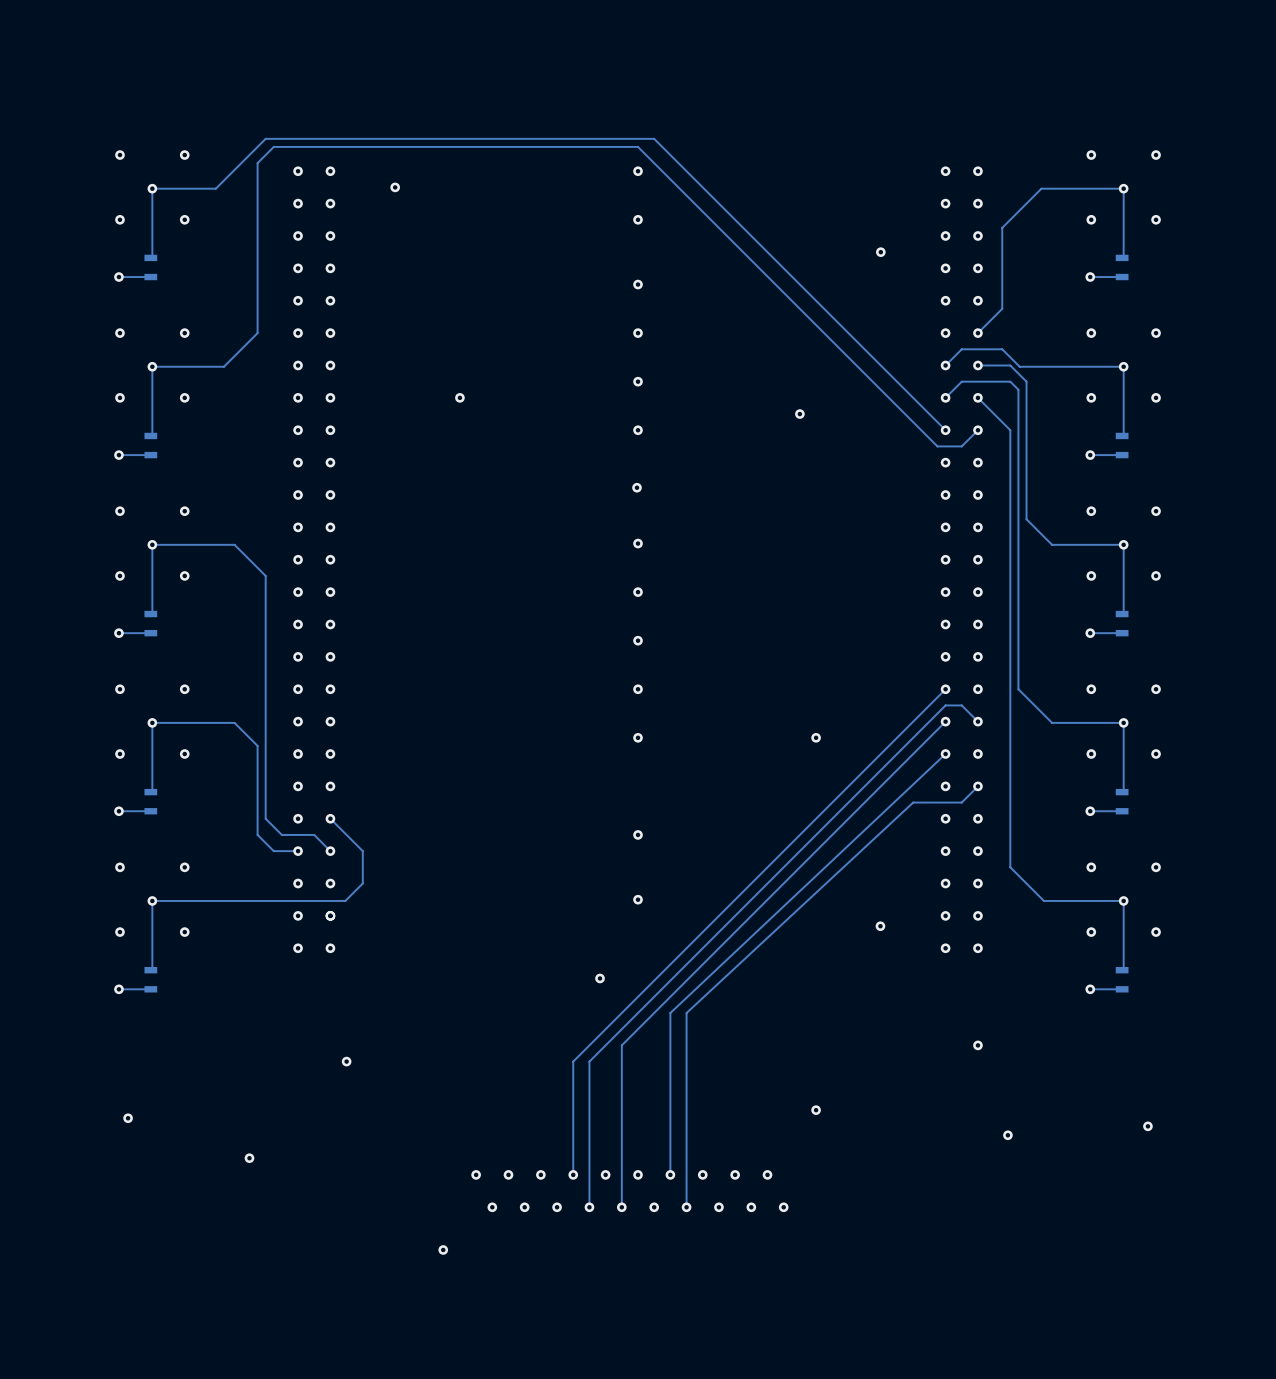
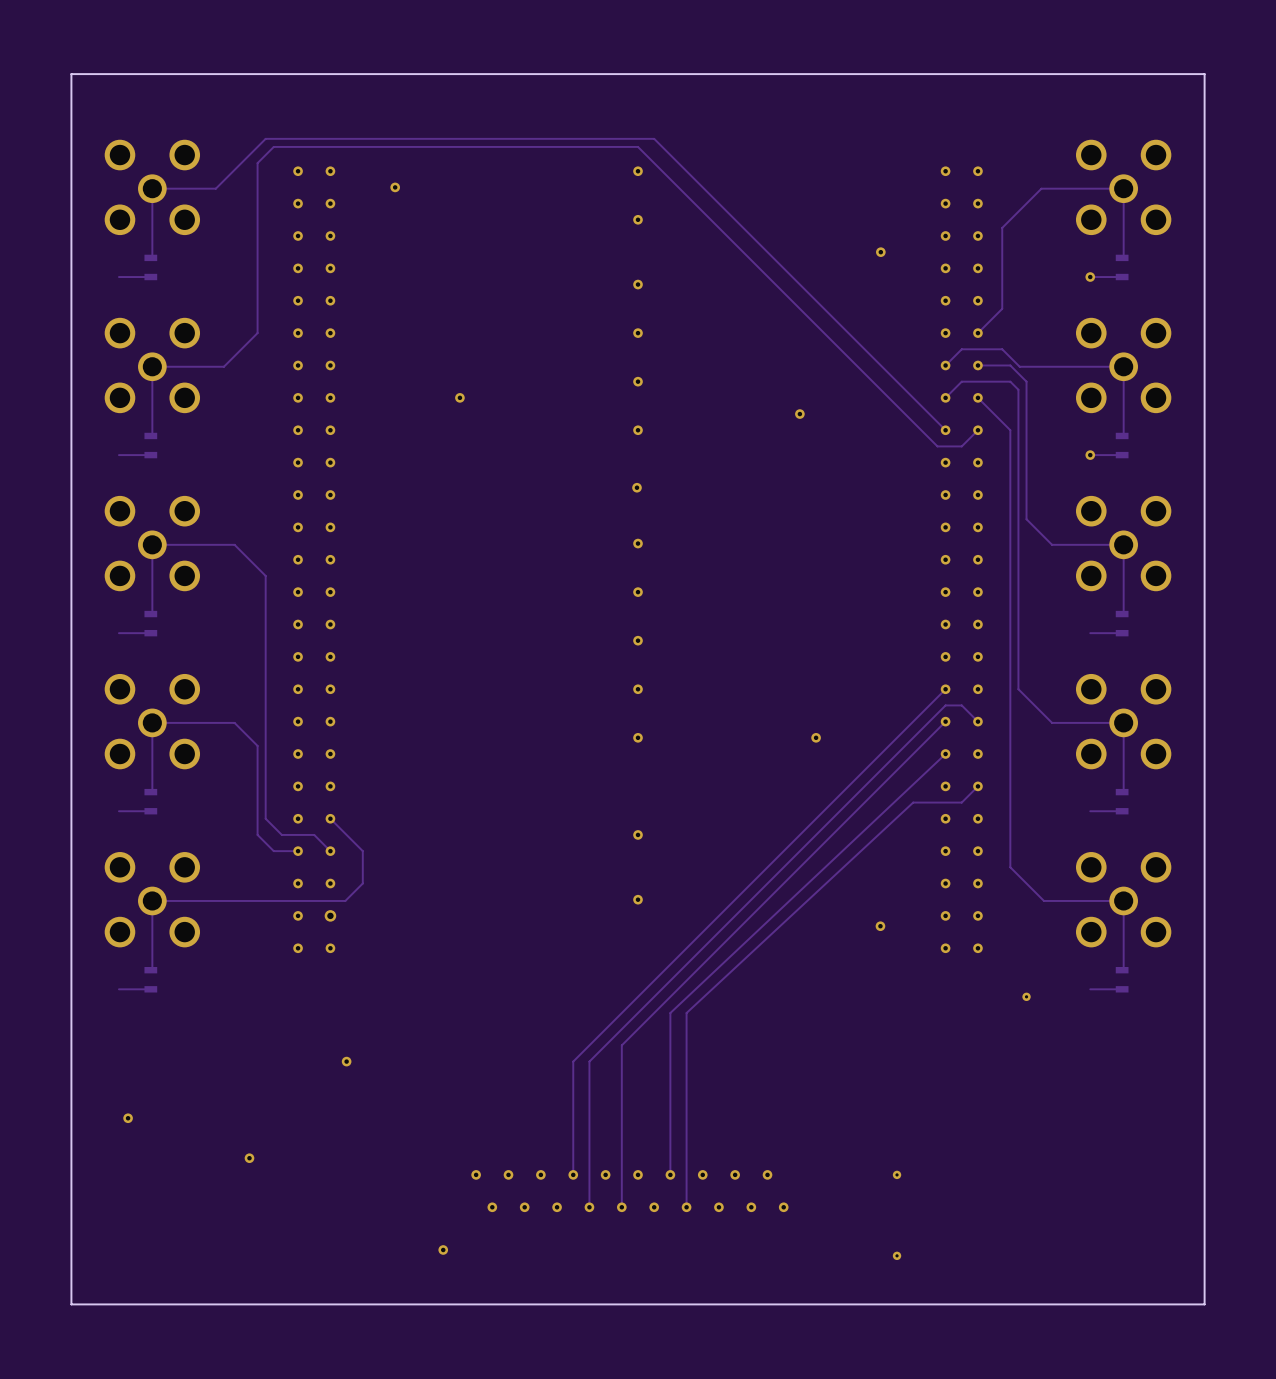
board edge: none -> (1204, 74) (1204, 1304) (71, 1304) (71, 74) (1204, 74)
via size: [115, 150, 125, 160] -> [104, 139, 136, 171]
via size: [179, 150, 190, 160] -> [169, 139, 201, 171]
via size: [1086, 150, 1097, 160] -> [1075, 139, 1107, 171]
via size: [1151, 150, 1161, 160] -> [1140, 139, 1172, 171]
via size: [147, 183, 158, 194] -> [138, 174, 167, 204]
via size: [1118, 183, 1129, 194] -> [1109, 174, 1139, 204]
via size: [115, 214, 125, 225] -> [104, 204, 136, 236]
via size: [179, 214, 190, 225] -> [169, 204, 201, 236]
via size: [1086, 214, 1097, 225] -> [1075, 204, 1107, 236]
via size: [1151, 214, 1161, 225] -> [1140, 204, 1172, 236]
via: (118, 277) -> none
via size: [115, 328, 125, 338] -> [104, 317, 136, 349]
via size: [179, 328, 190, 338] -> [169, 317, 201, 349]
via size: [1086, 328, 1097, 338] -> [1075, 317, 1107, 349]
via size: [1151, 328, 1161, 338] -> [1140, 317, 1172, 349]
via size: [147, 361, 158, 372] -> [138, 352, 167, 382]
via size: [1118, 361, 1129, 372] -> [1109, 352, 1139, 382]
via size: [115, 393, 125, 403] -> [104, 382, 136, 414]
via size: [179, 393, 190, 403] -> [169, 382, 201, 414]
via size: [1086, 393, 1097, 403] -> [1075, 382, 1107, 414]
via size: [1151, 393, 1161, 403] -> [1140, 382, 1172, 414]
via: (118, 455) -> none
via size: [115, 506, 125, 517] -> [104, 495, 136, 527]
via size: [179, 506, 190, 517] -> [169, 495, 201, 527]
via size: [1086, 506, 1097, 517] -> [1075, 495, 1107, 527]
via size: [1151, 506, 1161, 517] -> [1140, 495, 1172, 527]
via size: [147, 540, 158, 550] -> [138, 530, 167, 560]
via size: [1118, 540, 1129, 550] -> [1109, 530, 1139, 560]
via size: [115, 571, 125, 581] -> [104, 560, 136, 592]
via size: [179, 571, 190, 581] -> [169, 560, 201, 592]
via size: [1086, 571, 1097, 581] -> [1075, 560, 1107, 592]
via size: [1151, 571, 1161, 581] -> [1140, 560, 1172, 592]
via: (118, 633) -> none
via: (1090, 633) -> none
via size: [115, 684, 125, 695] -> [104, 673, 136, 705]
via size: [179, 684, 190, 695] -> [169, 673, 201, 705]
via size: [1086, 684, 1097, 695] -> [1075, 673, 1107, 705]
via size: [1151, 684, 1161, 695] -> [1140, 673, 1172, 705]
via size: [147, 718, 158, 728] -> [138, 708, 167, 738]
via size: [1118, 718, 1129, 728] -> [1109, 708, 1139, 738]
via size: [115, 749, 125, 759] -> [104, 738, 136, 770]
via size: [179, 749, 190, 759] -> [169, 738, 201, 770]
via size: [1086, 749, 1097, 759] -> [1075, 738, 1107, 770]
via size: [1151, 749, 1161, 759] -> [1140, 738, 1172, 770]
via: (118, 811) -> none
via: (1090, 811) -> none
via size: [115, 862, 125, 873] -> [104, 852, 136, 883]
via size: [179, 862, 190, 873] -> [169, 852, 201, 883]
via size: [1086, 862, 1097, 873] -> [1075, 852, 1107, 883]
via size: [1151, 862, 1161, 873] -> [1140, 852, 1172, 883]
via size: [147, 896, 158, 906] -> [138, 886, 167, 916]
via size: [1118, 896, 1129, 906] -> [1109, 886, 1139, 916]
via: none -> (330, 915)
via size: [115, 927, 125, 937] -> [104, 916, 136, 948]
via size: [179, 927, 190, 937] -> [169, 916, 201, 948]
via size: [1086, 927, 1097, 937] -> [1075, 916, 1107, 948]
via size: [1151, 927, 1161, 937] -> [1140, 916, 1172, 948]
via: (600, 978) -> none
via: (118, 989) -> none
via: (1090, 989) -> none
via: none -> (1026, 996)
via: (977, 1045) -> none
via: (816, 1110) -> none
via: (1147, 1126) -> none
via: (1007, 1135) -> none
via: none -> (897, 1174)
via: none -> (897, 1255)

